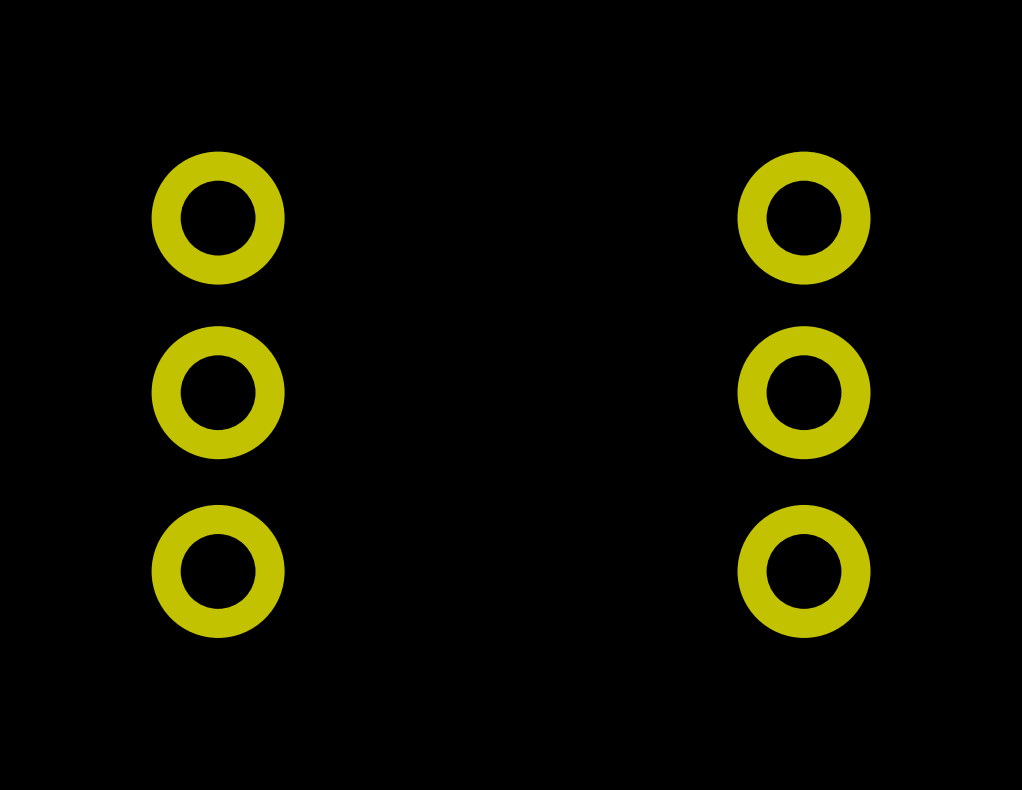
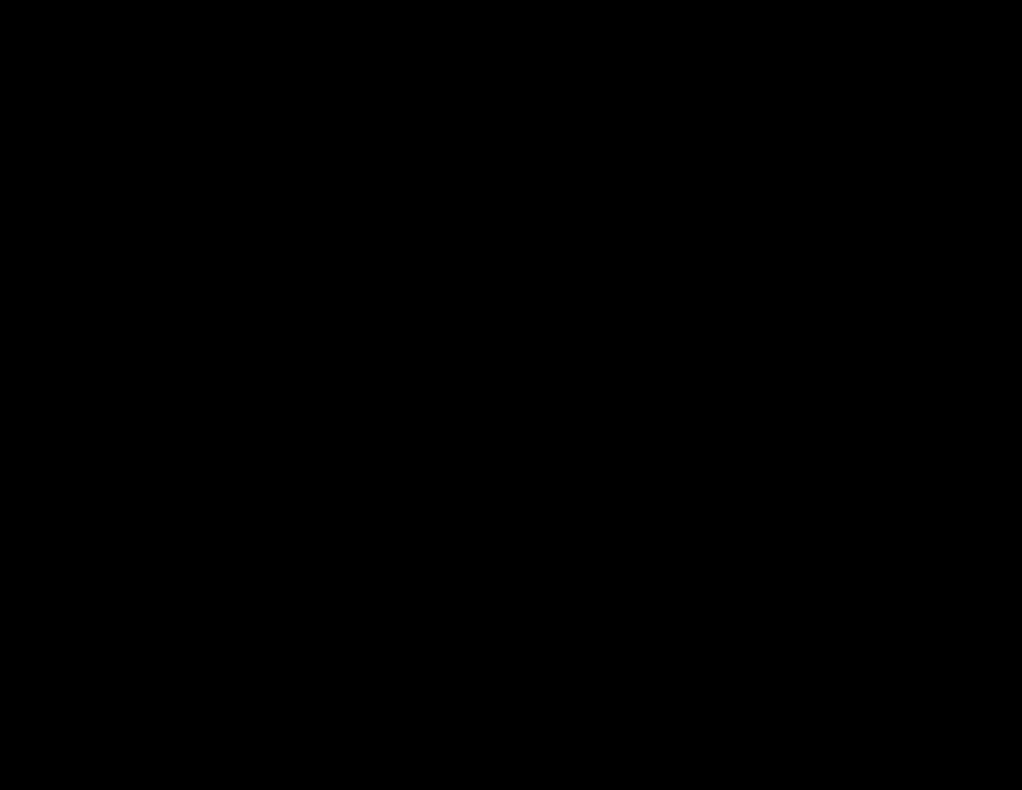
part: (218, 394) -> none
part: (804, 394) -> none

